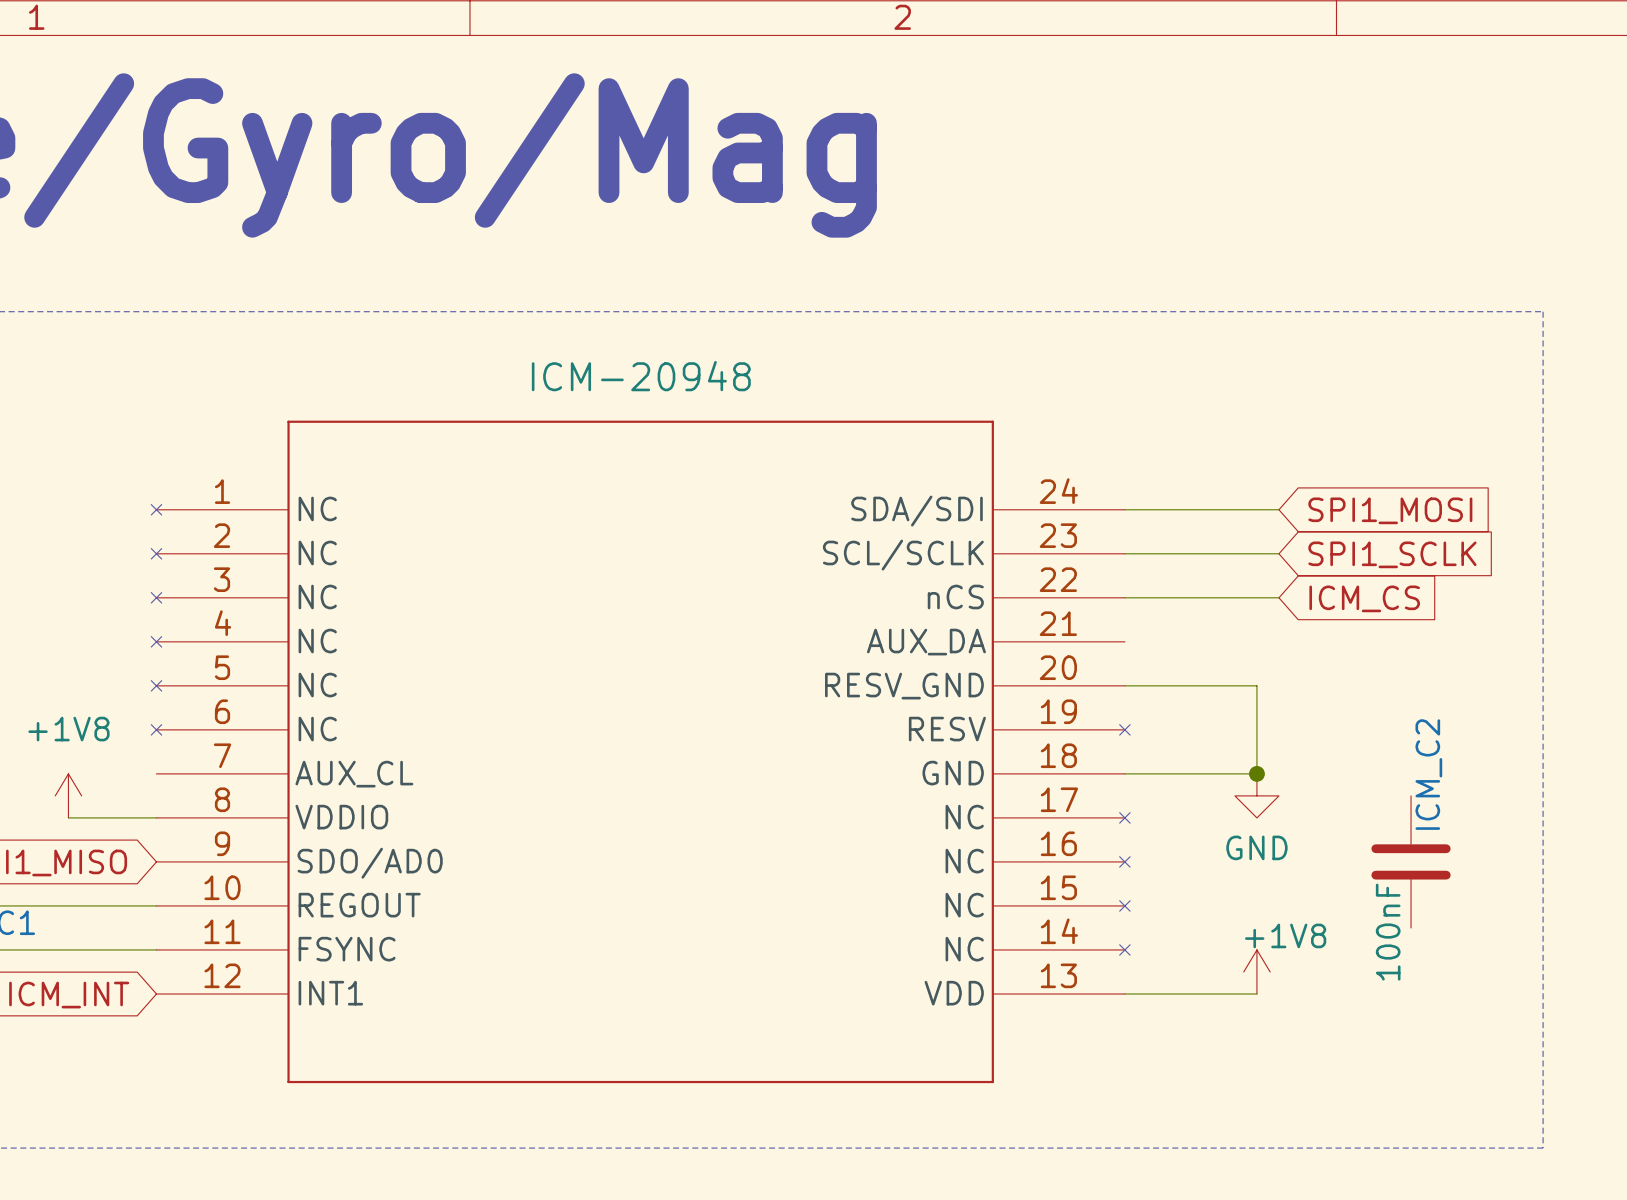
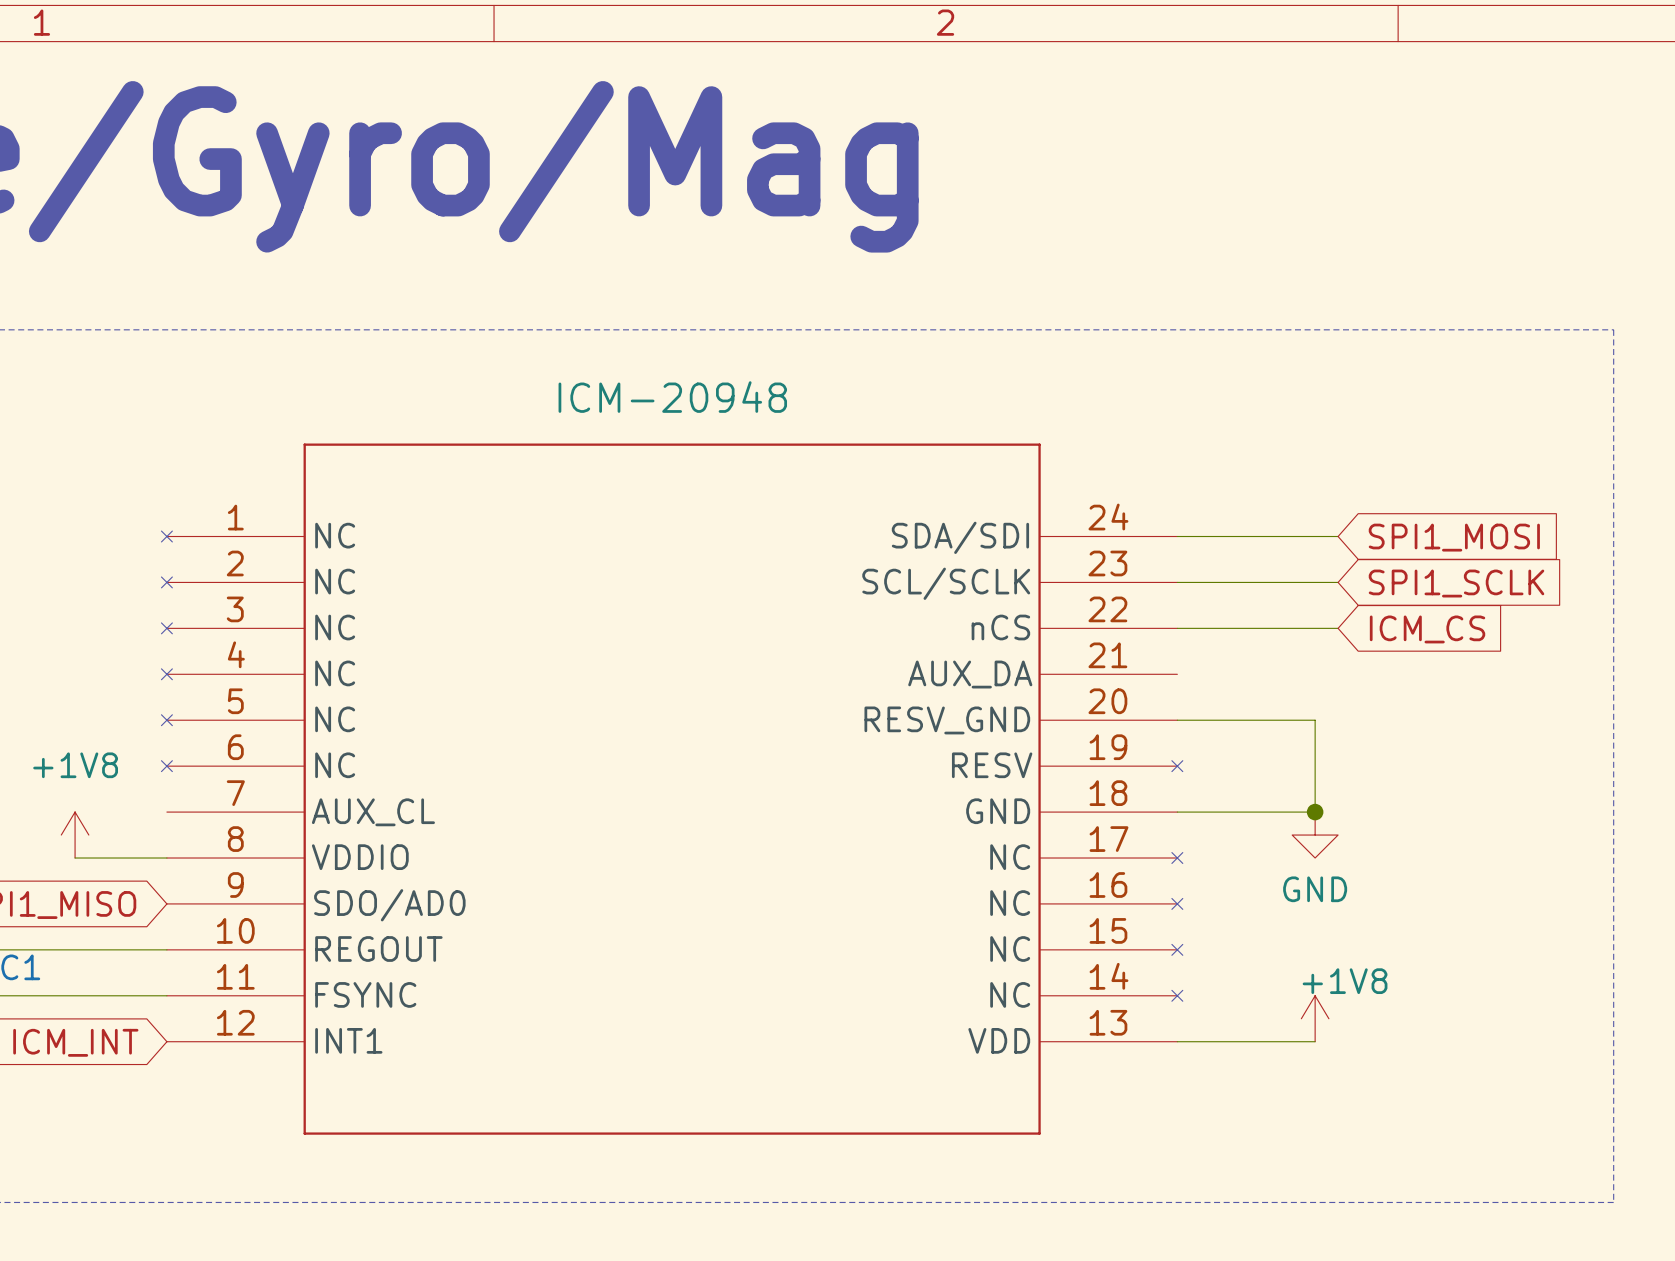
ICM_C2: 100nF (1411, 861) -> none

